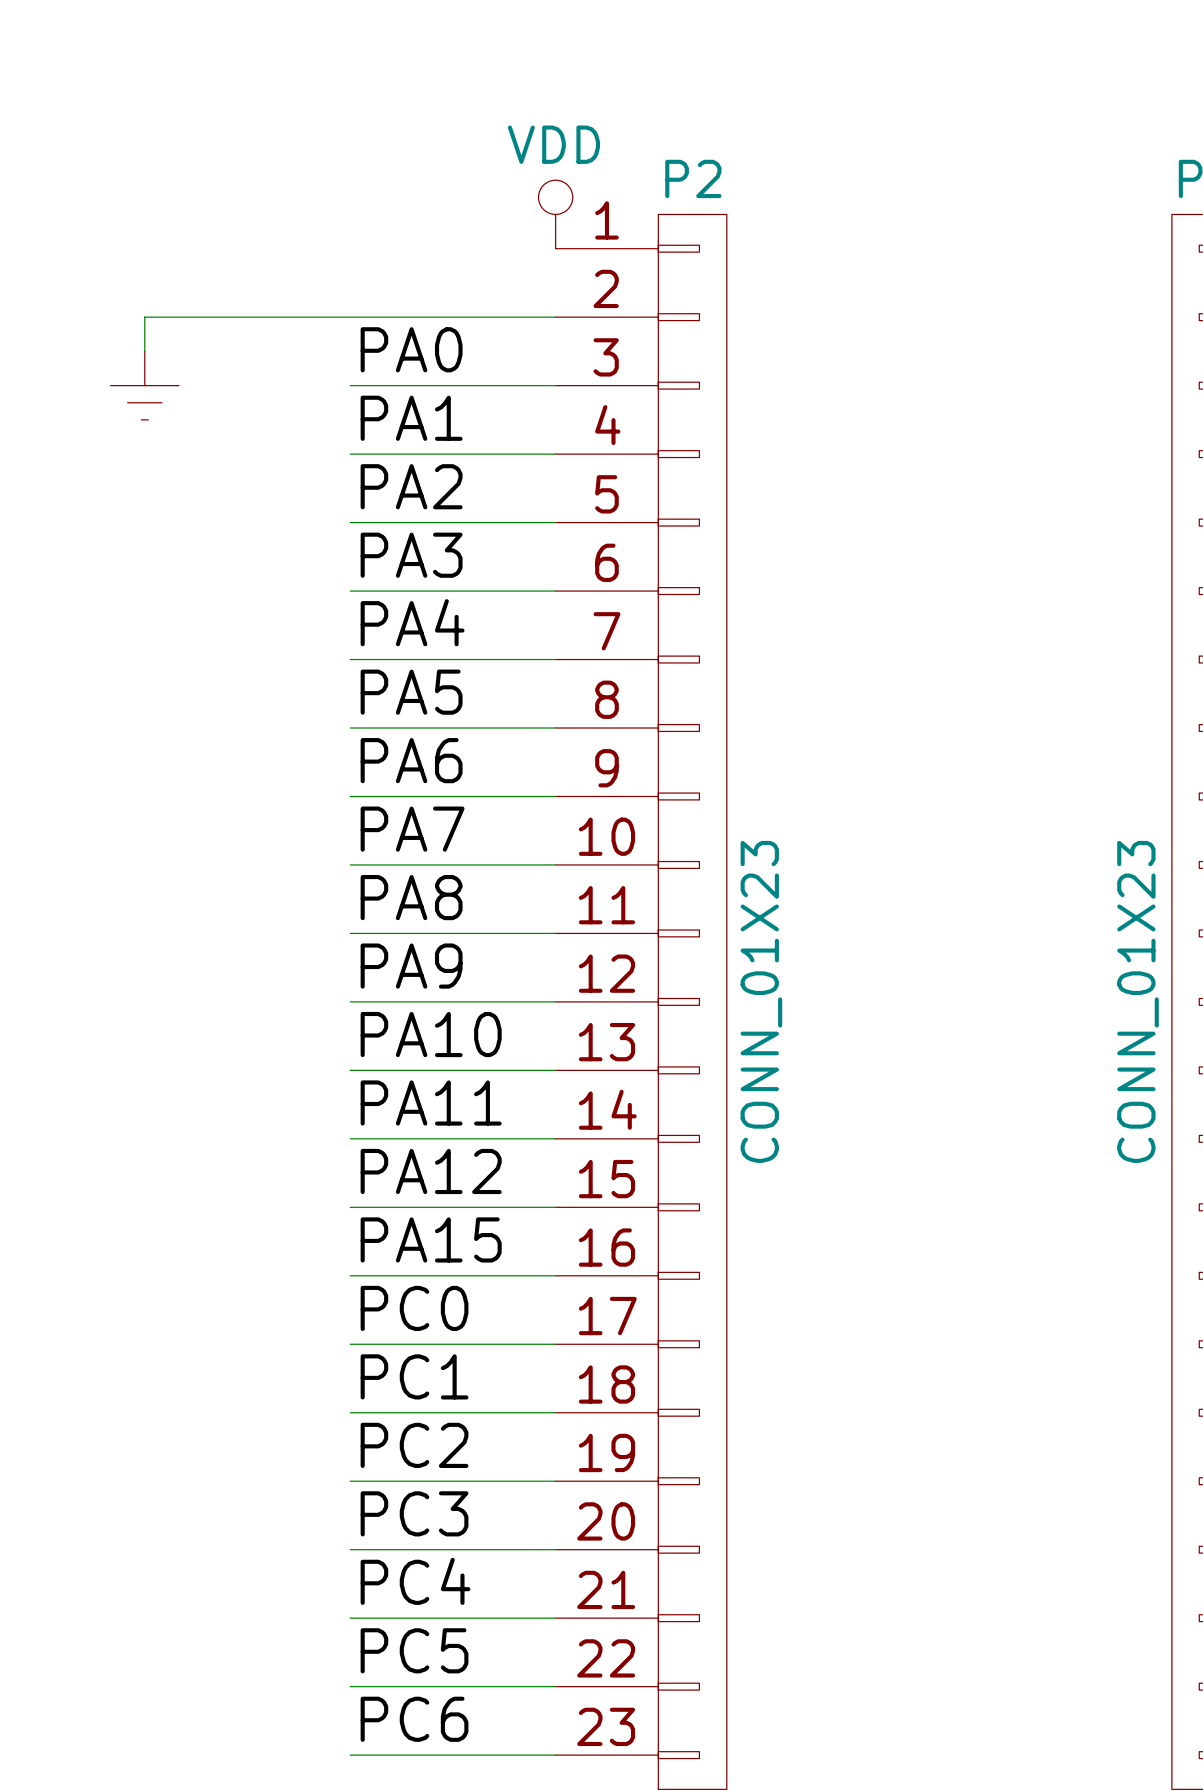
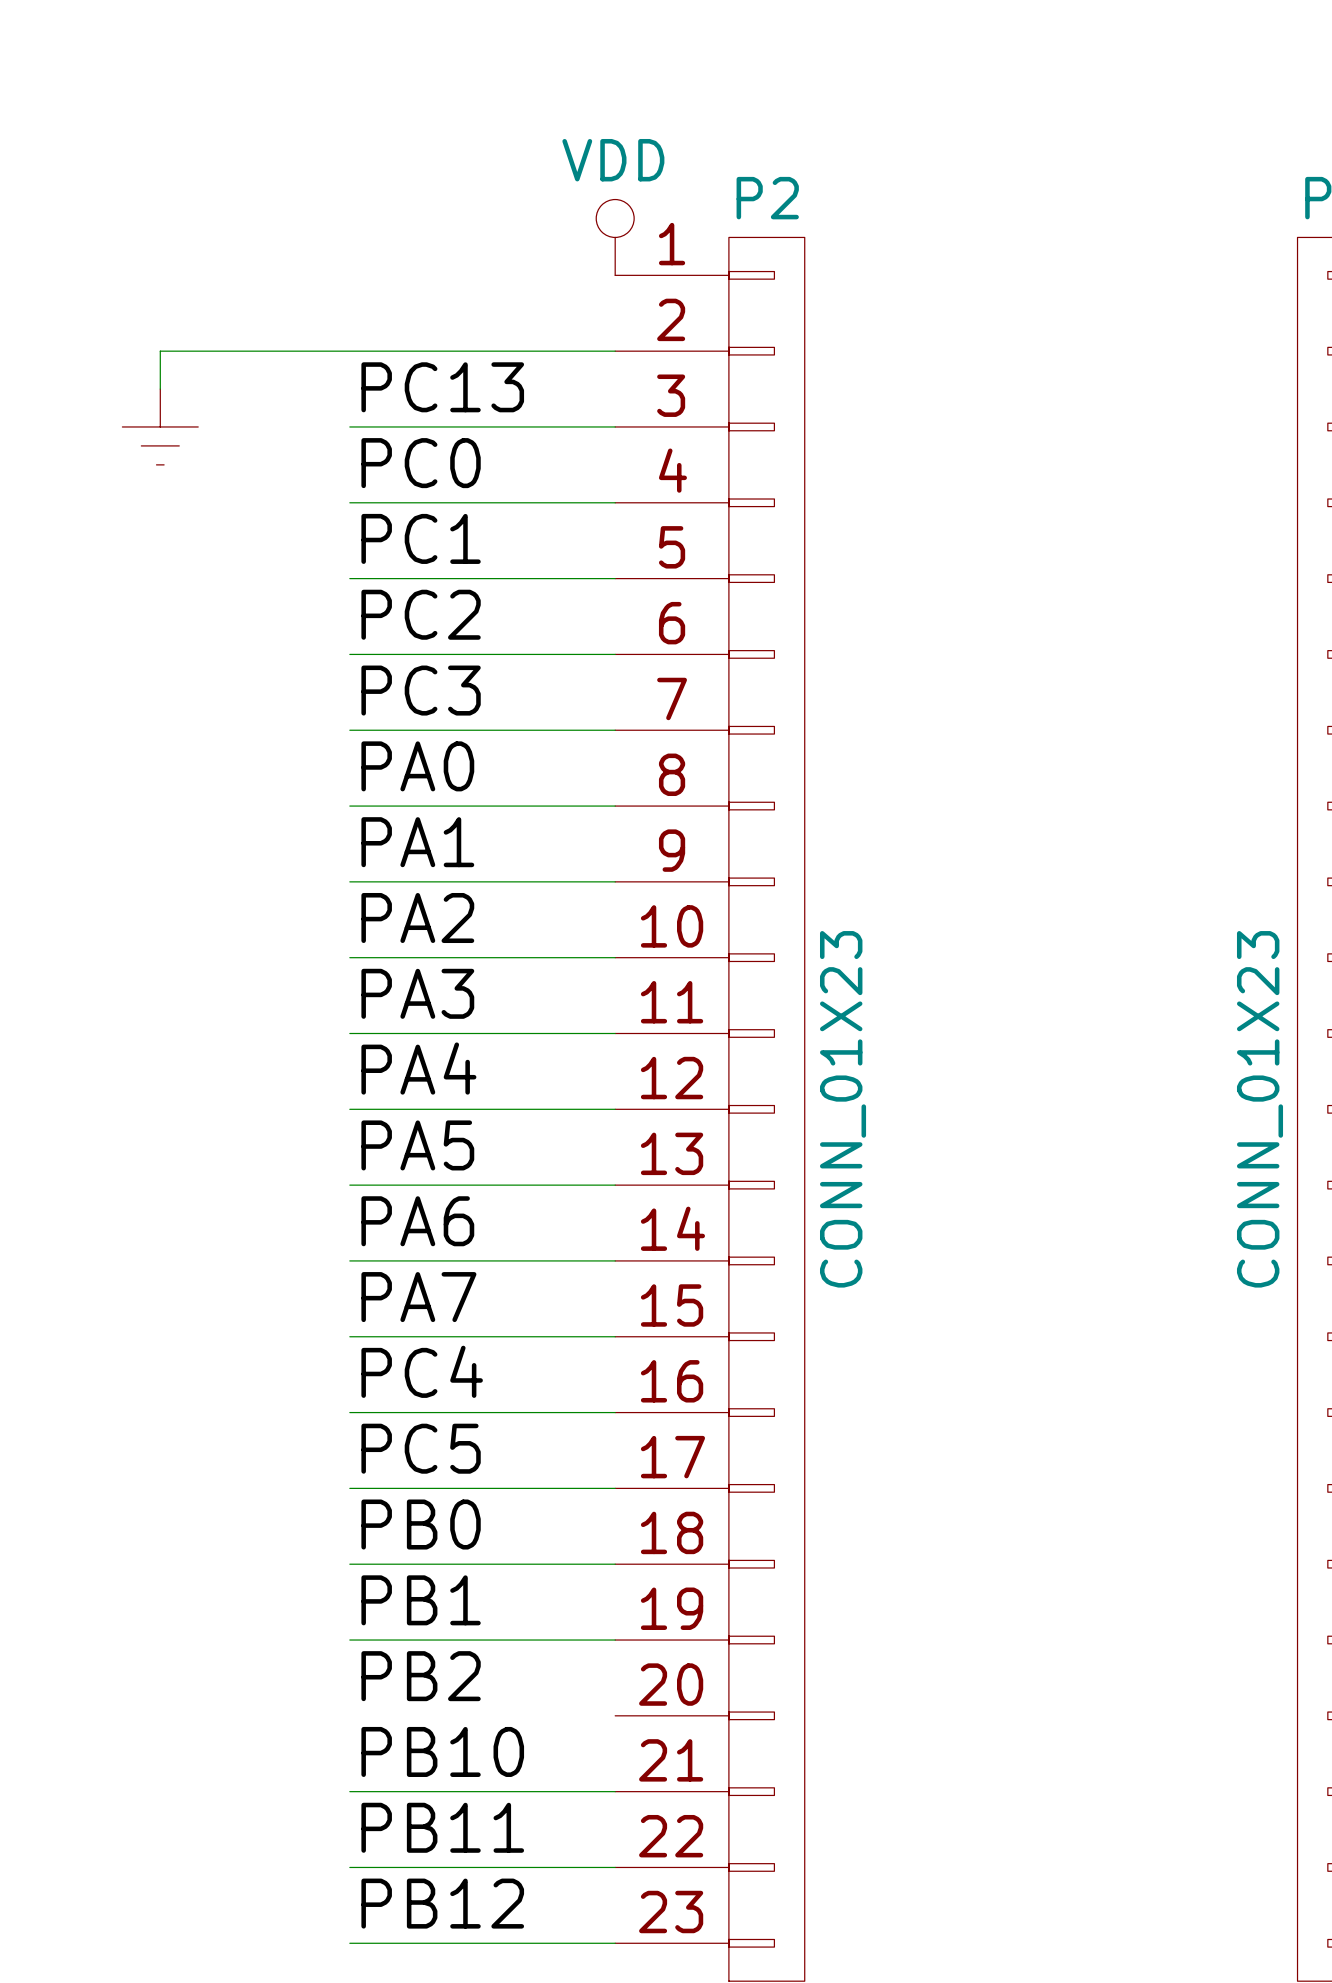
label: none -> PC13 (442, 387)
label position: PA0 (411, 349) -> PA0 (417, 766)
wire: none -> (349, 426) (387, 426)
label: none -> PC0 (421, 463)
label position: PA1 (411, 418) -> PA1 (417, 842)
wire: none -> (349, 502) (387, 502)
label: none -> PC1 (421, 538)
label position: PA2 (411, 486) -> PA2 (417, 918)
wire: none -> (349, 578) (387, 578)
label: none -> PC2 (421, 614)
label position: PA3 (411, 555) -> PA3 (417, 993)
wire: none -> (349, 654) (387, 654)
label position: PA4 (412, 622) -> PA4 (418, 1068)
label: none -> PC3 (421, 690)
wire: none -> (349, 730) (387, 730)
label position: PA5 (411, 692) -> PA5 (417, 1145)
wire: none -> (349, 806) (387, 806)
label position: PA6 (411, 760) -> PA6 (417, 1221)
wire: none -> (349, 881) (387, 881)
label position: PA7 (412, 829) -> PA7 (418, 1297)
wire: none -> (349, 957) (387, 957)
label: PA8 (411, 897) -> none
wire: none -> (349, 1033) (387, 1033)
label: PA9 (411, 966) -> none
wire: none -> (349, 1109) (387, 1109)
label: PA10 (431, 1034) -> none
wire: none -> (349, 1185) (387, 1185)
label: PA11 (431, 1103) -> none
wire: none -> (349, 1260) (387, 1260)
label: PA12 (431, 1171) -> none
wire: none -> (349, 1336) (387, 1336)
label: PA15 (431, 1239) -> none
wire: none -> (349, 1412) (387, 1412)
label: PC0 (414, 1308) -> PB0 (421, 1524)
wire: none -> (349, 1488) (387, 1488)
label: PC1 (414, 1376) -> PB1 (421, 1600)
wire: none -> (349, 1564) (387, 1564)
label: PC2 (414, 1445) -> PB2 (421, 1676)
wire: none -> (349, 1640) (387, 1640)
label: PC3 (414, 1513) -> none
wire: (350, 1549) (555, 1549) -> none
label position: PC4 (415, 1581) -> PC4 (422, 1371)
label: none -> PB10 (442, 1751)
wire: none -> (349, 1791) (387, 1791)
label: none -> PB11 (442, 1827)
label position: PC5 (414, 1650) -> PC5 (421, 1448)
wire: none -> (349, 1867) (387, 1867)
label: none -> PB12 (442, 1903)
label: PC6 (414, 1719) -> none
wire: none -> (349, 1943) (387, 1943)

